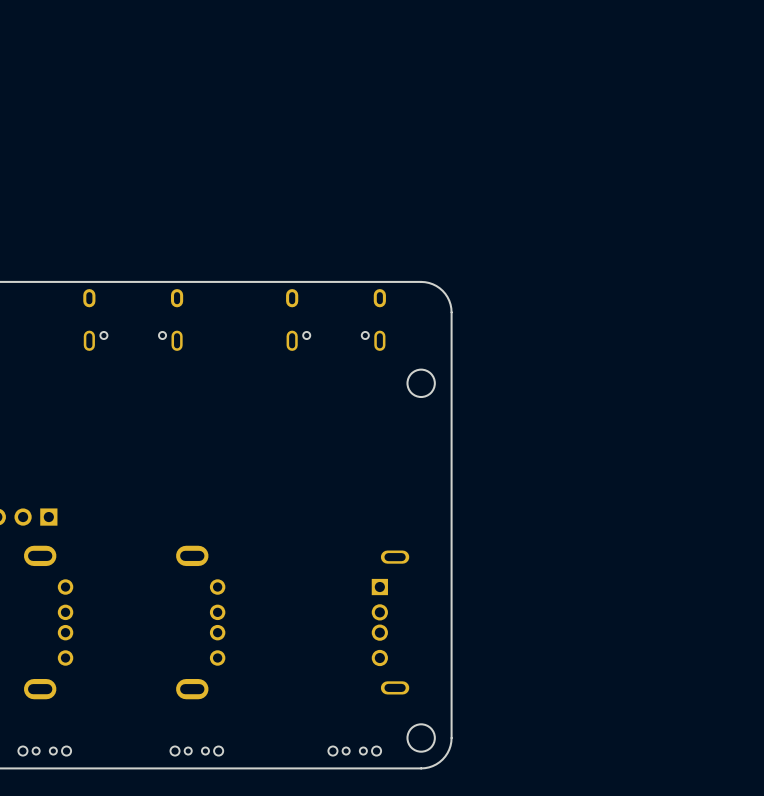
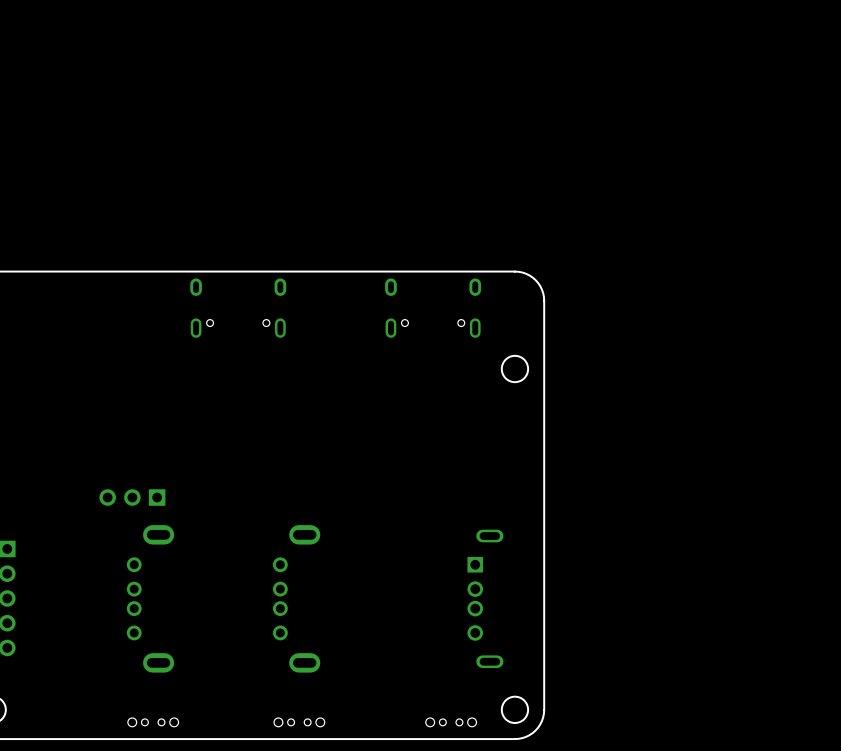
part rotation: 0° (48, 622) -> 180° (150, 598)
part rotation: 0° (200, 622) -> 180° (296, 598)

